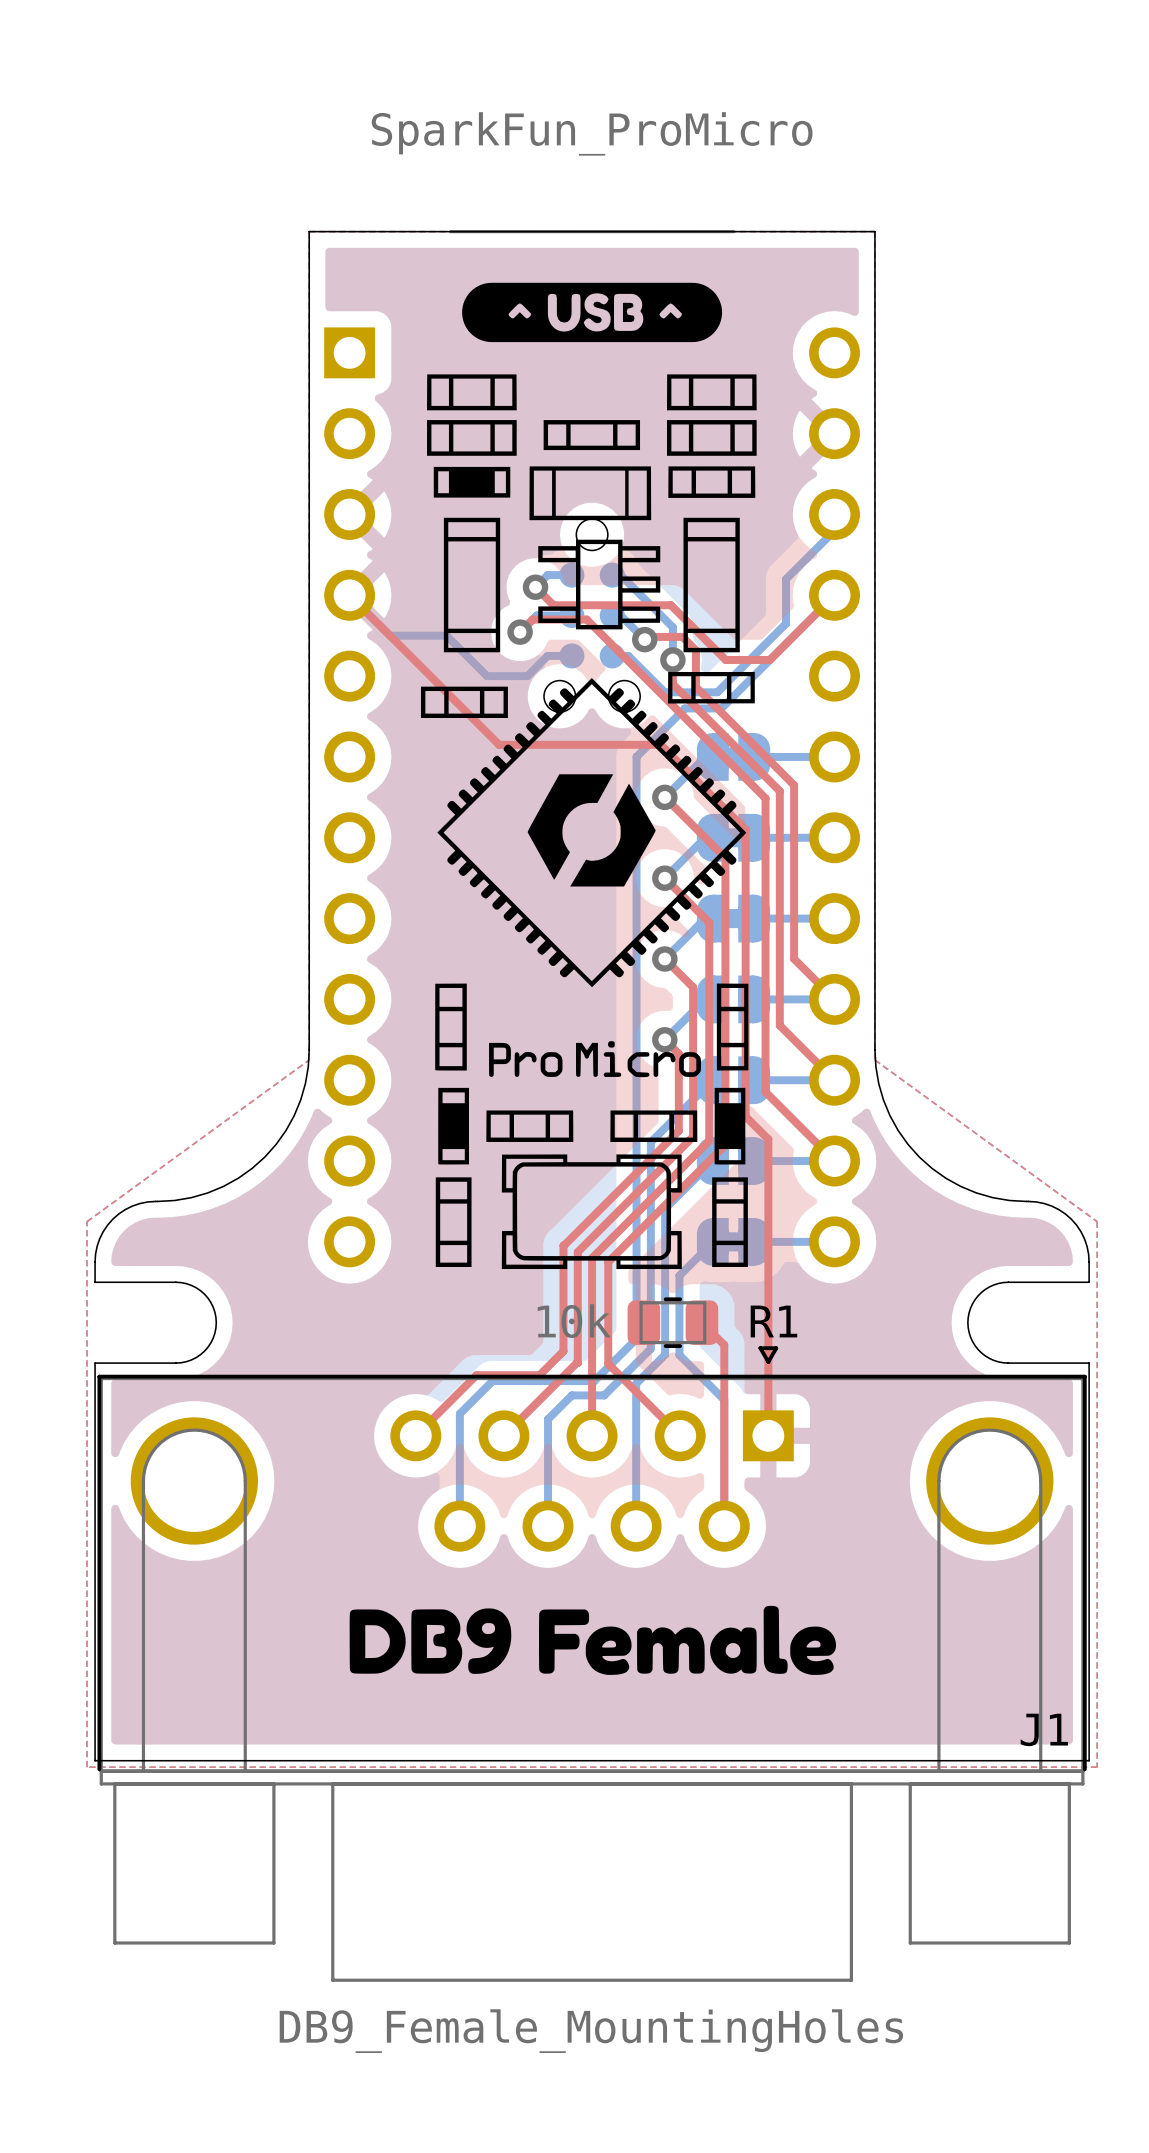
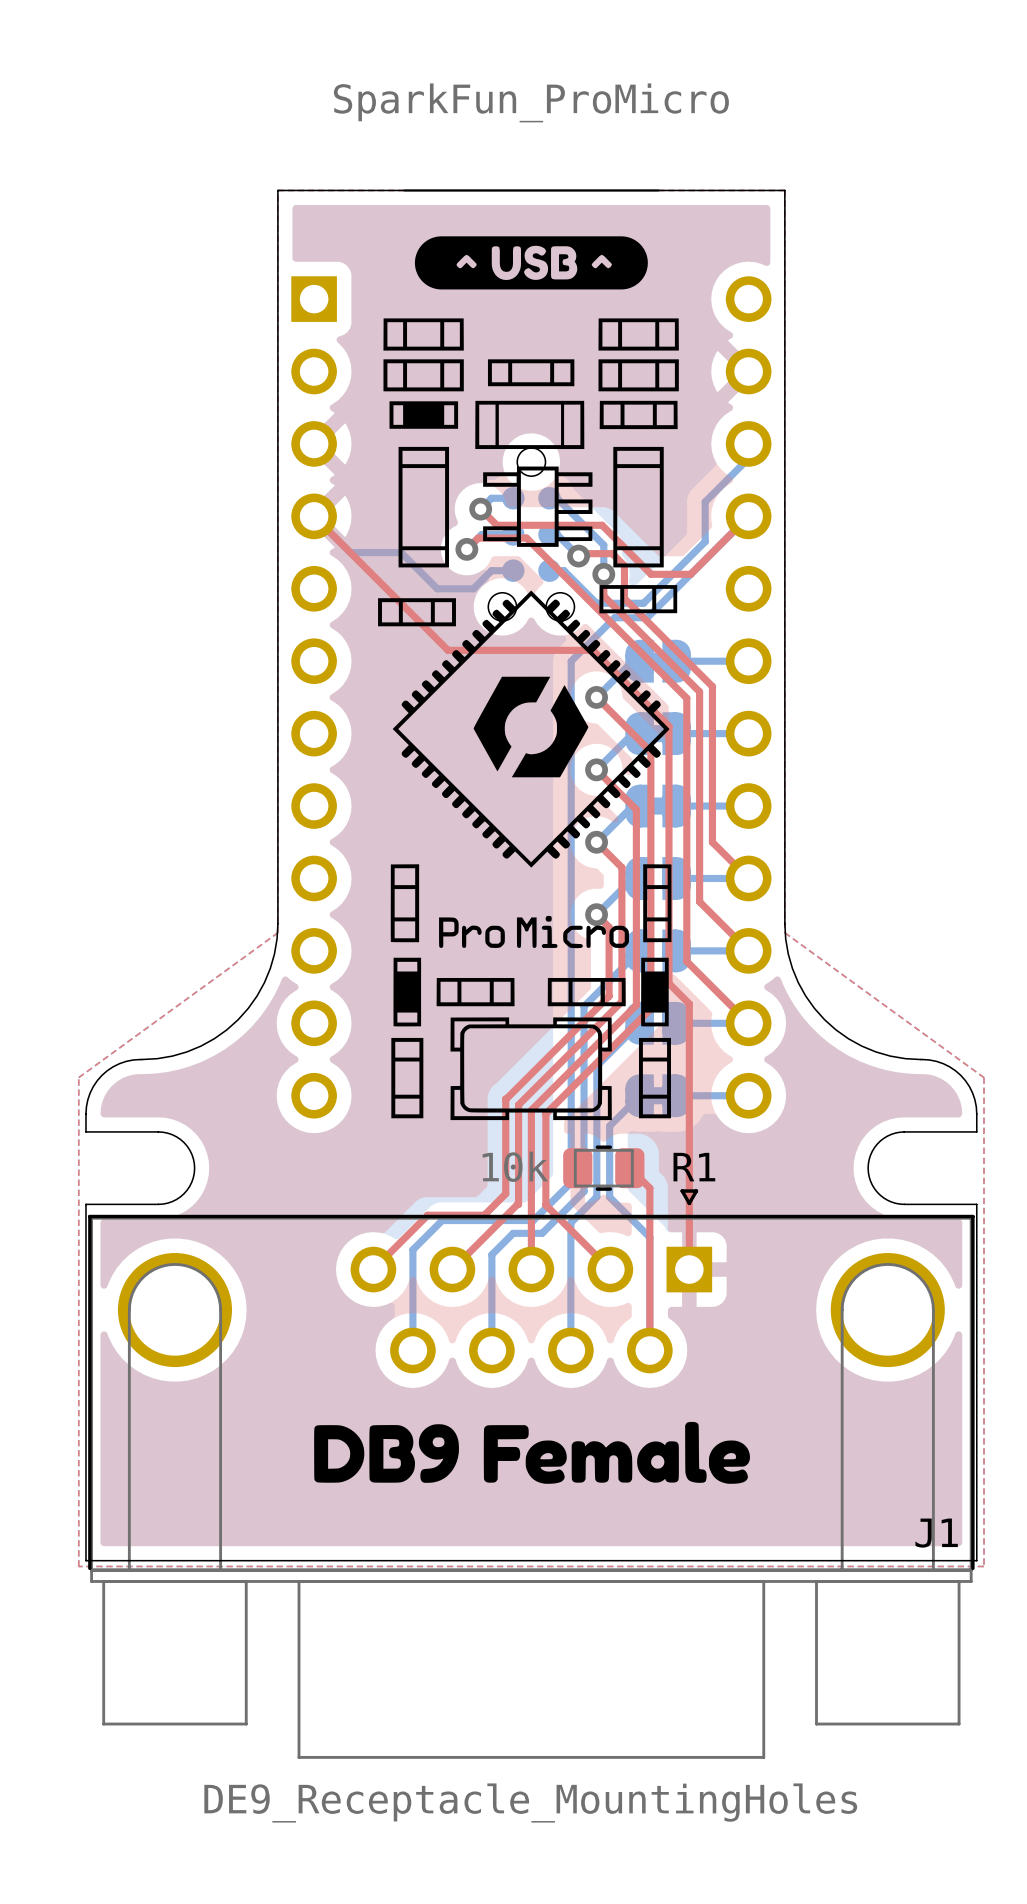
J1 value: DB9_Female_MountingHoles (591, 2031) -> DE9_Receptacle_MountingHoles (530, 1803)

